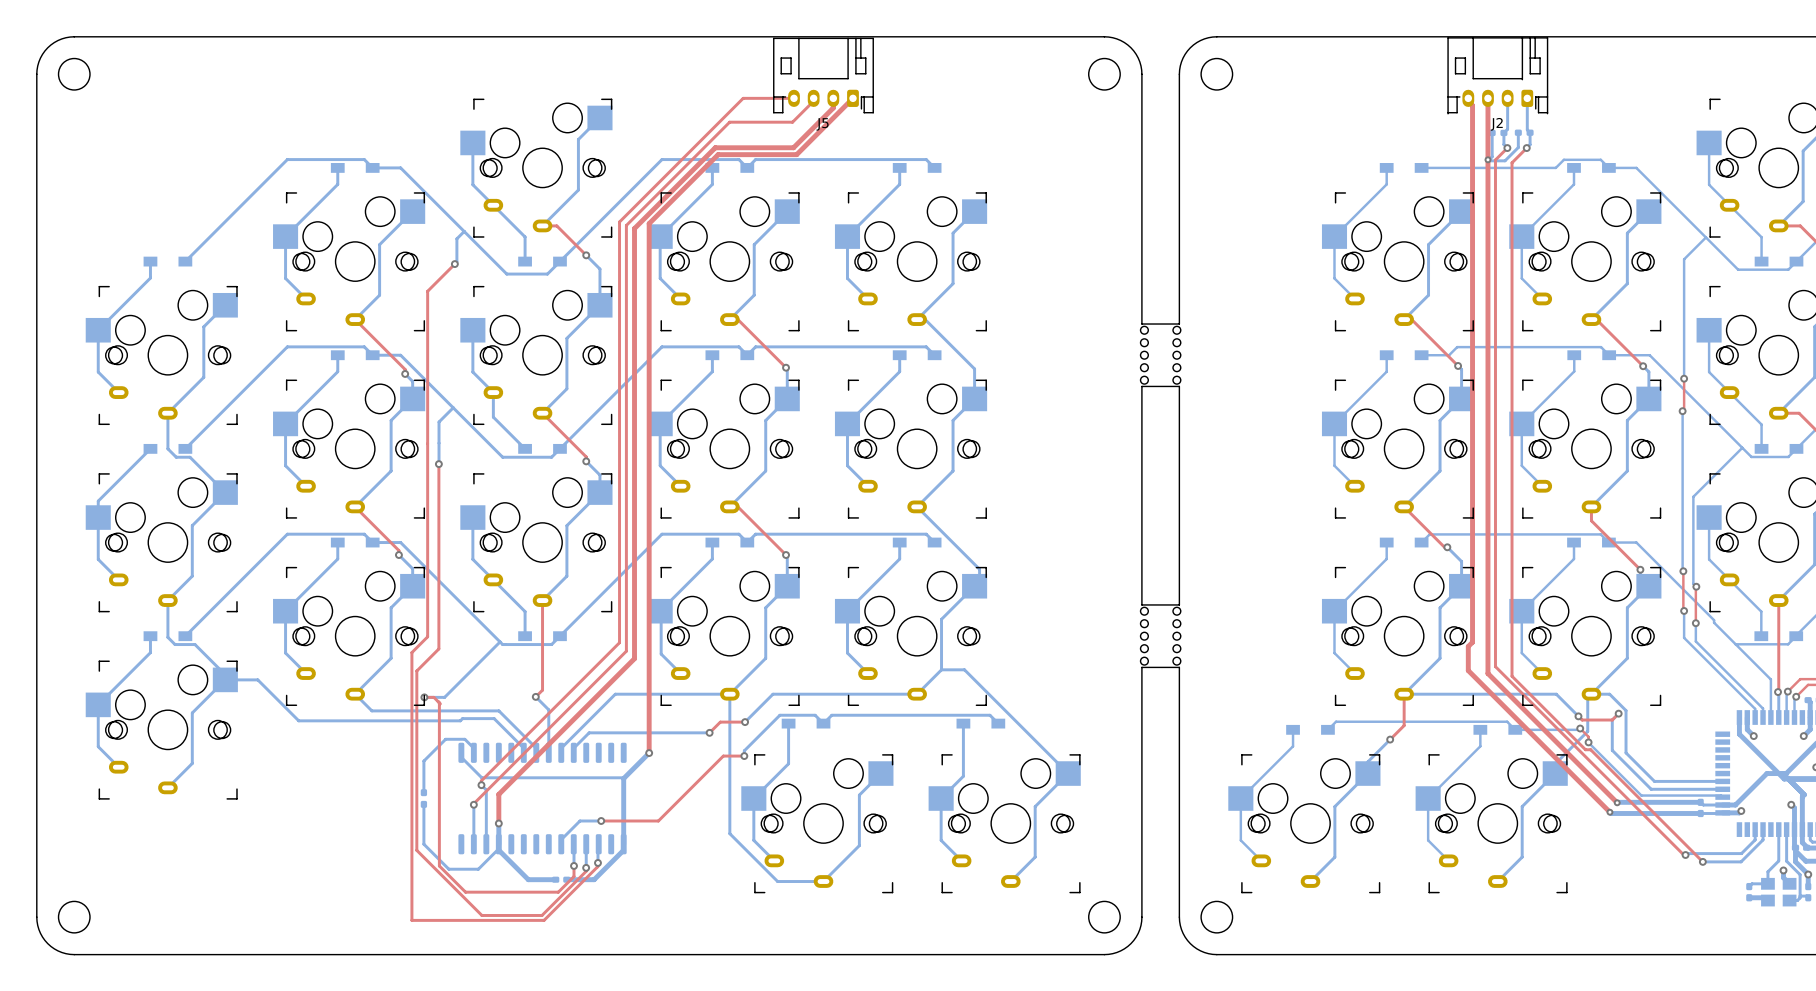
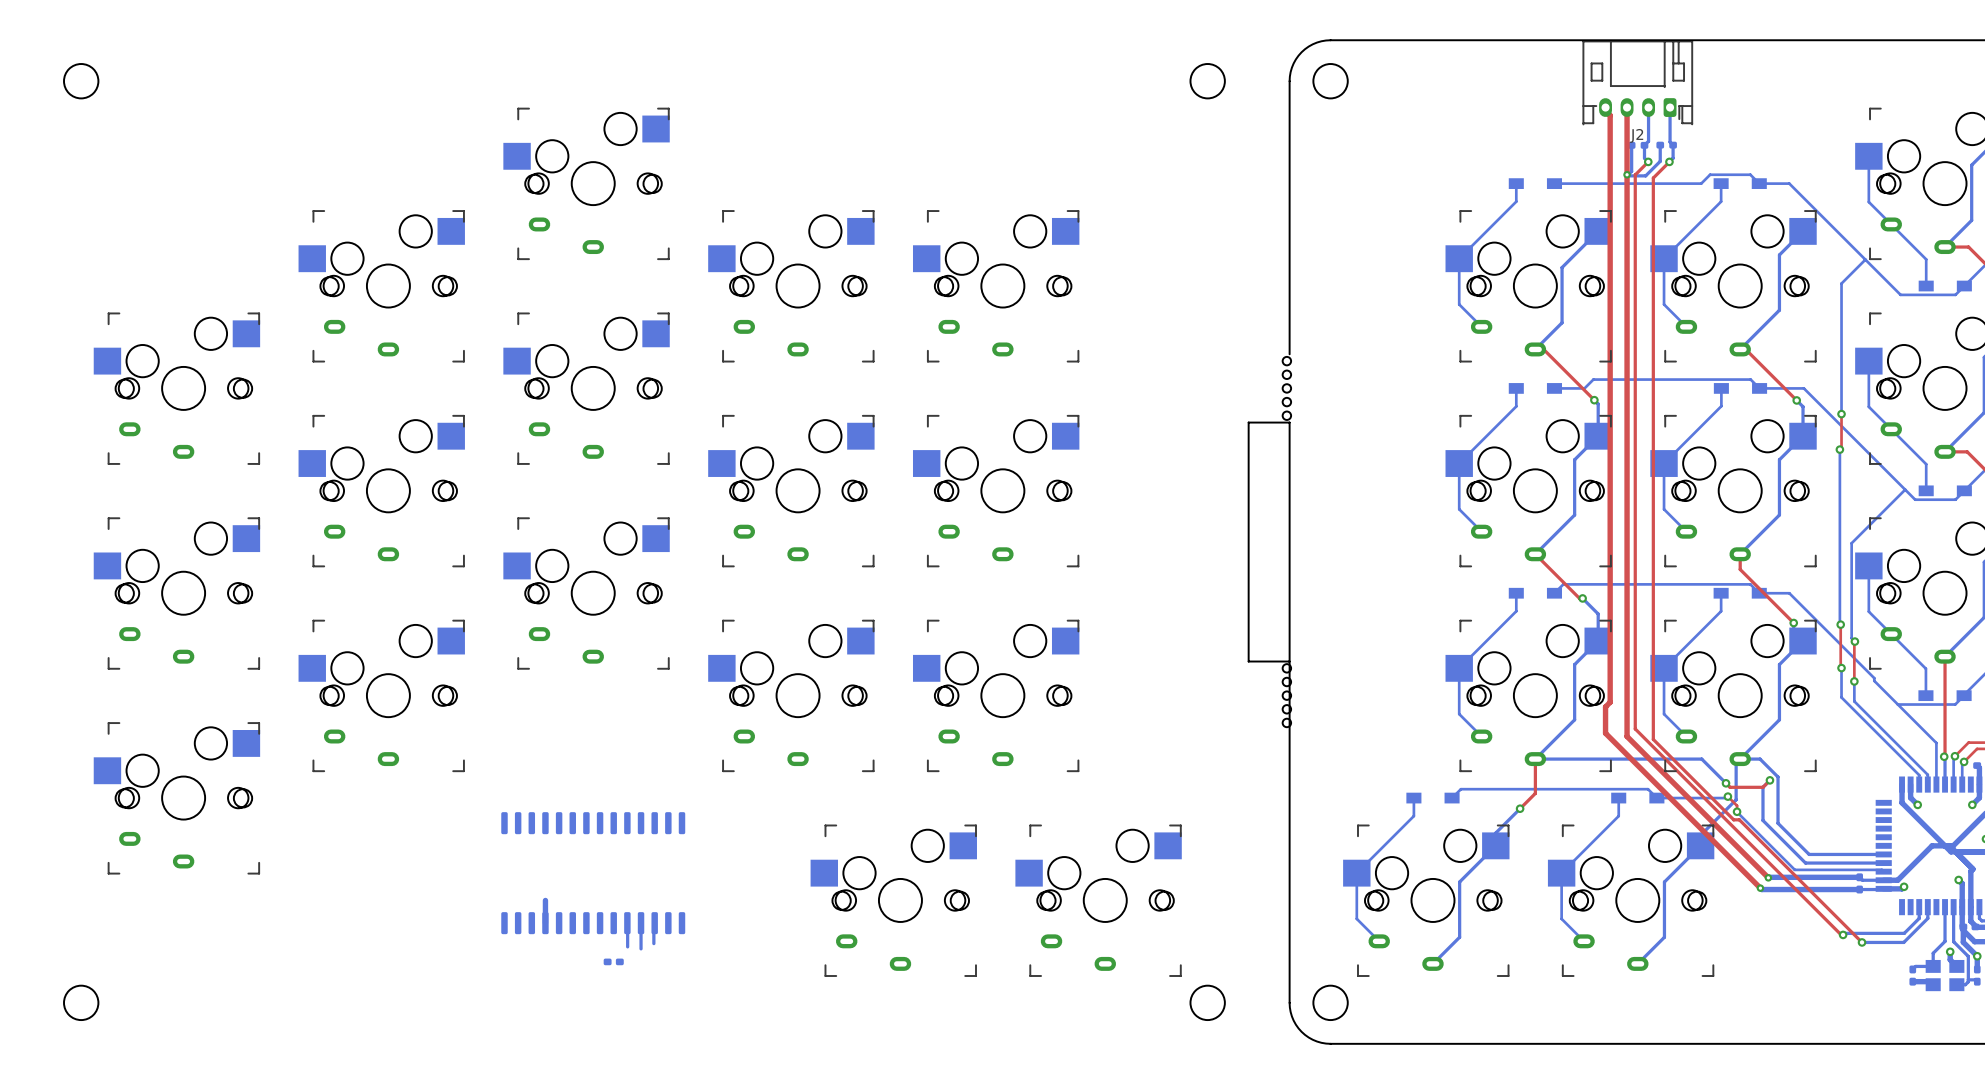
J5: (823, 75) -> none
top track: (794, 98) (743, 98) (619, 222) (619, 642) (481, 780) (481, 785) -> none
top track: (813, 98) (813, 101) (792, 122) (729, 122) (626, 225) (626, 651) (473, 804) -> none
top track: (833, 98) (833, 107) (793, 147) (715, 147) (634, 228) (634, 658) (498, 794) (498, 823) -> none
top track: (852, 98) (796, 154) (718, 154) (649, 223) (649, 753) -> none
bottom track: (599, 117) (578, 139) (578, 190) (542, 225) -> none
bottom track: (472, 142) (472, 184) (525, 236) (525, 261) -> none
bottom track: (337, 167) (337, 184) (285, 236) (285, 278) (306, 298) -> none
part: (355, 167) -> none
bottom track: (712, 167) (712, 184) (660, 236) (660, 278) (680, 298) -> none
part: (729, 167) -> none
bottom track: (899, 167) (899, 184) (847, 236) (847, 278) (867, 298) -> none
part: (917, 167) -> none
bottom track: (934, 167) (926, 159) (755, 159) (747, 167) (738, 159) (661, 159) (547, 274) (506, 274) (400, 167) (372, 167) (364, 159) (287, 159) (185, 261) -> none
bottom track: (412, 211) (379, 244) (379, 295) (355, 319) -> none
bottom track: (787, 211) (754, 244) (754, 295) (729, 319) -> none
bottom track: (974, 211) (953, 233) (953, 283) (917, 319) -> none
top track: (542, 225) (556, 225) (586, 255) -> none
bottom track: (464, 231) (456, 238) (456, 262) (454, 264) -> none
bottom track: (586, 255) (599, 269) (599, 305) (566, 338) (566, 388) (542, 413) -> none
via: (586, 255) -> none
bottom track: (150, 261) (150, 278) (98, 330) (98, 372) (118, 392) -> none
part: (167, 261) -> none
part: (542, 261) -> none
top track: (454, 264) (427, 291) (427, 636) (411, 652) (411, 920) (544, 920) (597, 866) (597, 862) -> none
via: (454, 264) -> none
bottom track: (225, 305) (203, 326) (203, 377) (167, 413) (167, 448) (176, 457) (190, 457) (225, 492) (192, 525) (192, 576) (167, 600) (167, 637) (175, 644) (195, 644) (225, 674) -> none
top track: (355, 319) (405, 369) (405, 373) -> none
top track: (737, 319) (786, 367) -> none
bottom track: (925, 319) (974, 368) (974, 398) (953, 420) (953, 471) (917, 506) (979, 569) (979, 573) -> none
board edge: (1179, 324) (1141, 324) (1141, 70) (1133, 50) (1124, 42) (1112, 37) (74, 36) (58, 40) (42, 54) (36, 74) (37, 925) (42, 937) (50, 946) (61, 952) (74, 954) (1112, 953) (1130, 943) (1138, 933) (1141, 921) (1141, 667) (1179, 667) -> (1289, 661) (1289, 729)
bottom track: (472, 330) (472, 372) (493, 392) (493, 417) (525, 448) -> none
bottom track: (337, 355) (337, 371) (285, 423) (285, 465) (306, 486) -> none
part: (355, 355) -> none
bottom track: (712, 355) (712, 371) (660, 423) (660, 465) (680, 486) -> none
part: (729, 355) -> none
bottom track: (899, 355) (899, 371) (847, 423) (847, 465) (867, 486) -> none
part: (917, 355) -> none
bottom track: (934, 355) (926, 346) (755, 346) (747, 355) (738, 346) (661, 346) (551, 457) (502, 457) (400, 355) (372, 355) (364, 346) (287, 346) (185, 448) -> none
part: (1144, 355) -> none
bottom track: (786, 367) (787, 398) (765, 420) (765, 471) (729, 506) -> none
via: (786, 367) -> none
bottom track: (405, 373) (412, 381) (412, 398) (391, 420) (391, 471) (355, 506) -> none
via: (405, 373) -> none
bottom track: (453, 407) (439, 422) (439, 463) -> none
top track: (542, 413) (586, 456) (586, 461) -> none
bottom track: (150, 448) (98, 501) (98, 559) (118, 579) -> none
part: (167, 448) -> none
part: (542, 448) -> none
bottom track: (586, 461) (599, 475) (599, 492) (566, 525) (566, 576) (542, 600) -> none
via: (586, 461) -> none
top track: (438, 464) (438, 648) (416, 670) (416, 850) (481, 915) (542, 915) (586, 871) (586, 867) -> none
via: (438, 464) -> none
top track: (355, 506) (398, 550) (398, 555) -> none
top track: (737, 506) (786, 555) -> none
bottom track: (472, 517) (472, 559) (525, 611) (525, 636) -> none
bottom track: (337, 542) (337, 559) (285, 611) (285, 653) (306, 673) -> none
part: (355, 542) -> none
bottom track: (712, 542) (712, 559) (660, 611) -> none
part: (729, 542) -> none
bottom track: (899, 542) (899, 559) (847, 611) (847, 653) (867, 673) -> none
part: (917, 542) -> none
bottom track: (934, 542) (926, 534) (755, 534) (747, 542) (738, 534) (661, 534) (551, 644) (502, 644) (400, 542) (372, 542) (364, 534) (287, 534) (185, 636) -> none
bottom track: (398, 555) (412, 568) (412, 586) (391, 607) (391, 658) (355, 694) (371, 710) (498, 710) (536, 748) (536, 752) -> none
via: (398, 555) -> none
bottom track: (786, 555) (787, 586) (765, 607) (765, 658) (729, 694) -> none
via: (786, 555) -> none
bottom track: (974, 586) (941, 619) (941, 669) -> none
top track: (542, 600) (542, 690) (535, 696) -> none
bottom track: (661, 611) (661, 654) (680, 673) -> none
bottom track: (150, 636) (150, 652) (98, 704) (98, 746) (118, 767) -> none
part: (167, 636) -> none
part: (542, 636) -> none
part: (1144, 636) -> none
bottom track: (500, 641) (444, 697) (424, 697) -> none
bottom track: (941, 669) (964, 669) (1068, 773) (1035, 806) (1035, 857) (1010, 881) -> none
bottom track: (941, 669) (917, 694) (772, 694) (745, 722) -> none
bottom track: (729, 694) (729, 833) (777, 881) (823, 881) (859, 845) (859, 795) (880, 773) -> none
bottom track: (729, 694) (615, 694) (561, 748) (561, 752) -> none
bottom track: (535, 696) (548, 709) (548, 752) -> none
via: (535, 696) -> none
top track: (424, 697) (433, 697) (440, 703) -> none
via: (424, 697) -> none
top track: (439, 702) (439, 866) (465, 892) (558, 892) (574, 876) (574, 865) -> none
top track: (745, 722) (720, 722) (709, 732) -> none
via: (745, 722) -> none
bottom track: (788, 723) (788, 763) (753, 798) (753, 840) (774, 860) -> none
part: (806, 723) -> none
bottom track: (963, 723) (963, 776) (941, 798) (941, 840) (961, 860) -> none
part: (980, 723) -> none
bottom track: (998, 723) (989, 715) (831, 715) (823, 723) (815, 715) (779, 715) (744, 750) (744, 756) -> none
bottom track: (709, 732) (589, 732) (573, 748) (573, 752) -> none
via: (709, 732) -> none
bottom track: (473, 748) (464, 739) (445, 739) (423, 761) (423, 792) -> none
bottom track: (523, 752) (523, 748) (494, 718) (462, 718) (460, 720) (298, 720) (257, 679) (225, 679) (192, 712) (192, 763) (167, 787) -> none
bottom track: (649, 753) (623, 778) (623, 844) -> none
via: (649, 753) -> none
top track: (744, 756) (723, 756) (658, 821) (601, 821) -> none
via: (744, 756) -> none
bottom track: (461, 757) (481, 777) (624, 777) -> none
bottom track: (481, 785) (486, 790) (486, 844) -> none
via: (481, 785) -> none
part: (423, 798) -> none
bottom track: (423, 804) (423, 844) (448, 869) (478, 869) (498, 848) -> none
bottom track: (473, 804) (473, 844) -> none
via: (473, 804) -> none
bottom track: (601, 821) (579, 821) (561, 839) (561, 844) -> none
via: (601, 821) -> none
via: (498, 823) -> none
bottom track: (498, 850) (528, 879) (555, 879) -> none
bottom track: (623, 850) (594, 879) (566, 879) -> none
via: (597, 862) -> none
via: (574, 865) -> none
via: (586, 867) -> none

